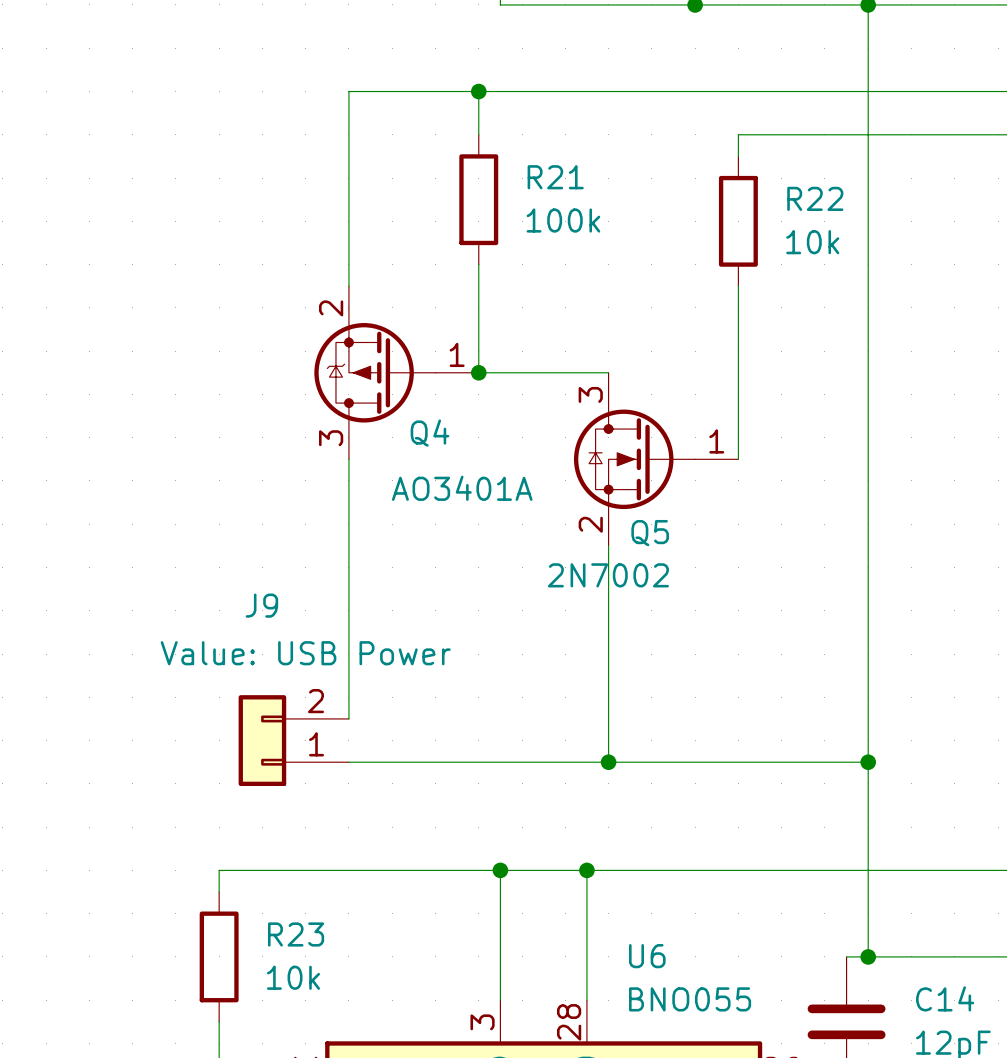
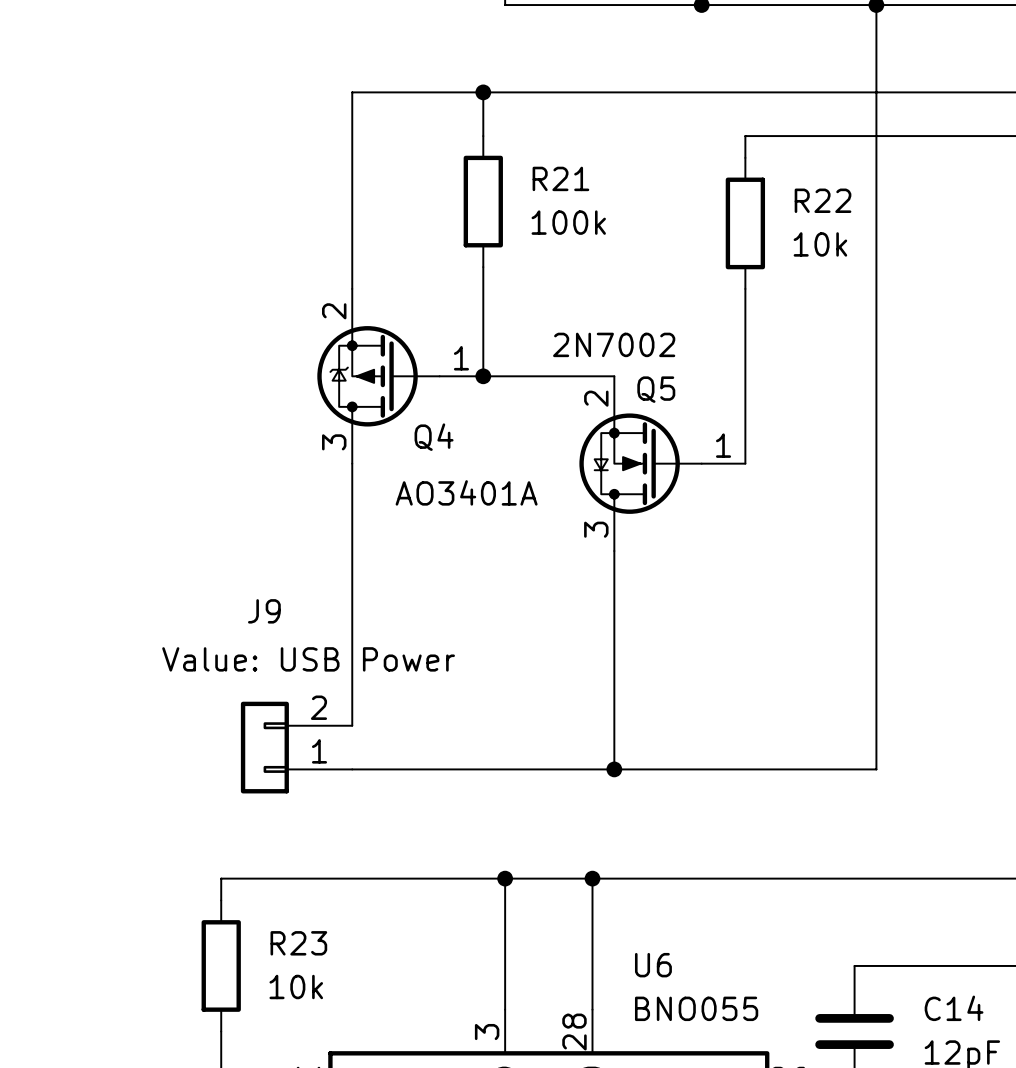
Q5 flip: as is (634, 459) -> up-down (640, 463)
wire: (868, 762) (868, 956) -> none
junction: (868, 762) -> none
junction: (868, 956) -> none

